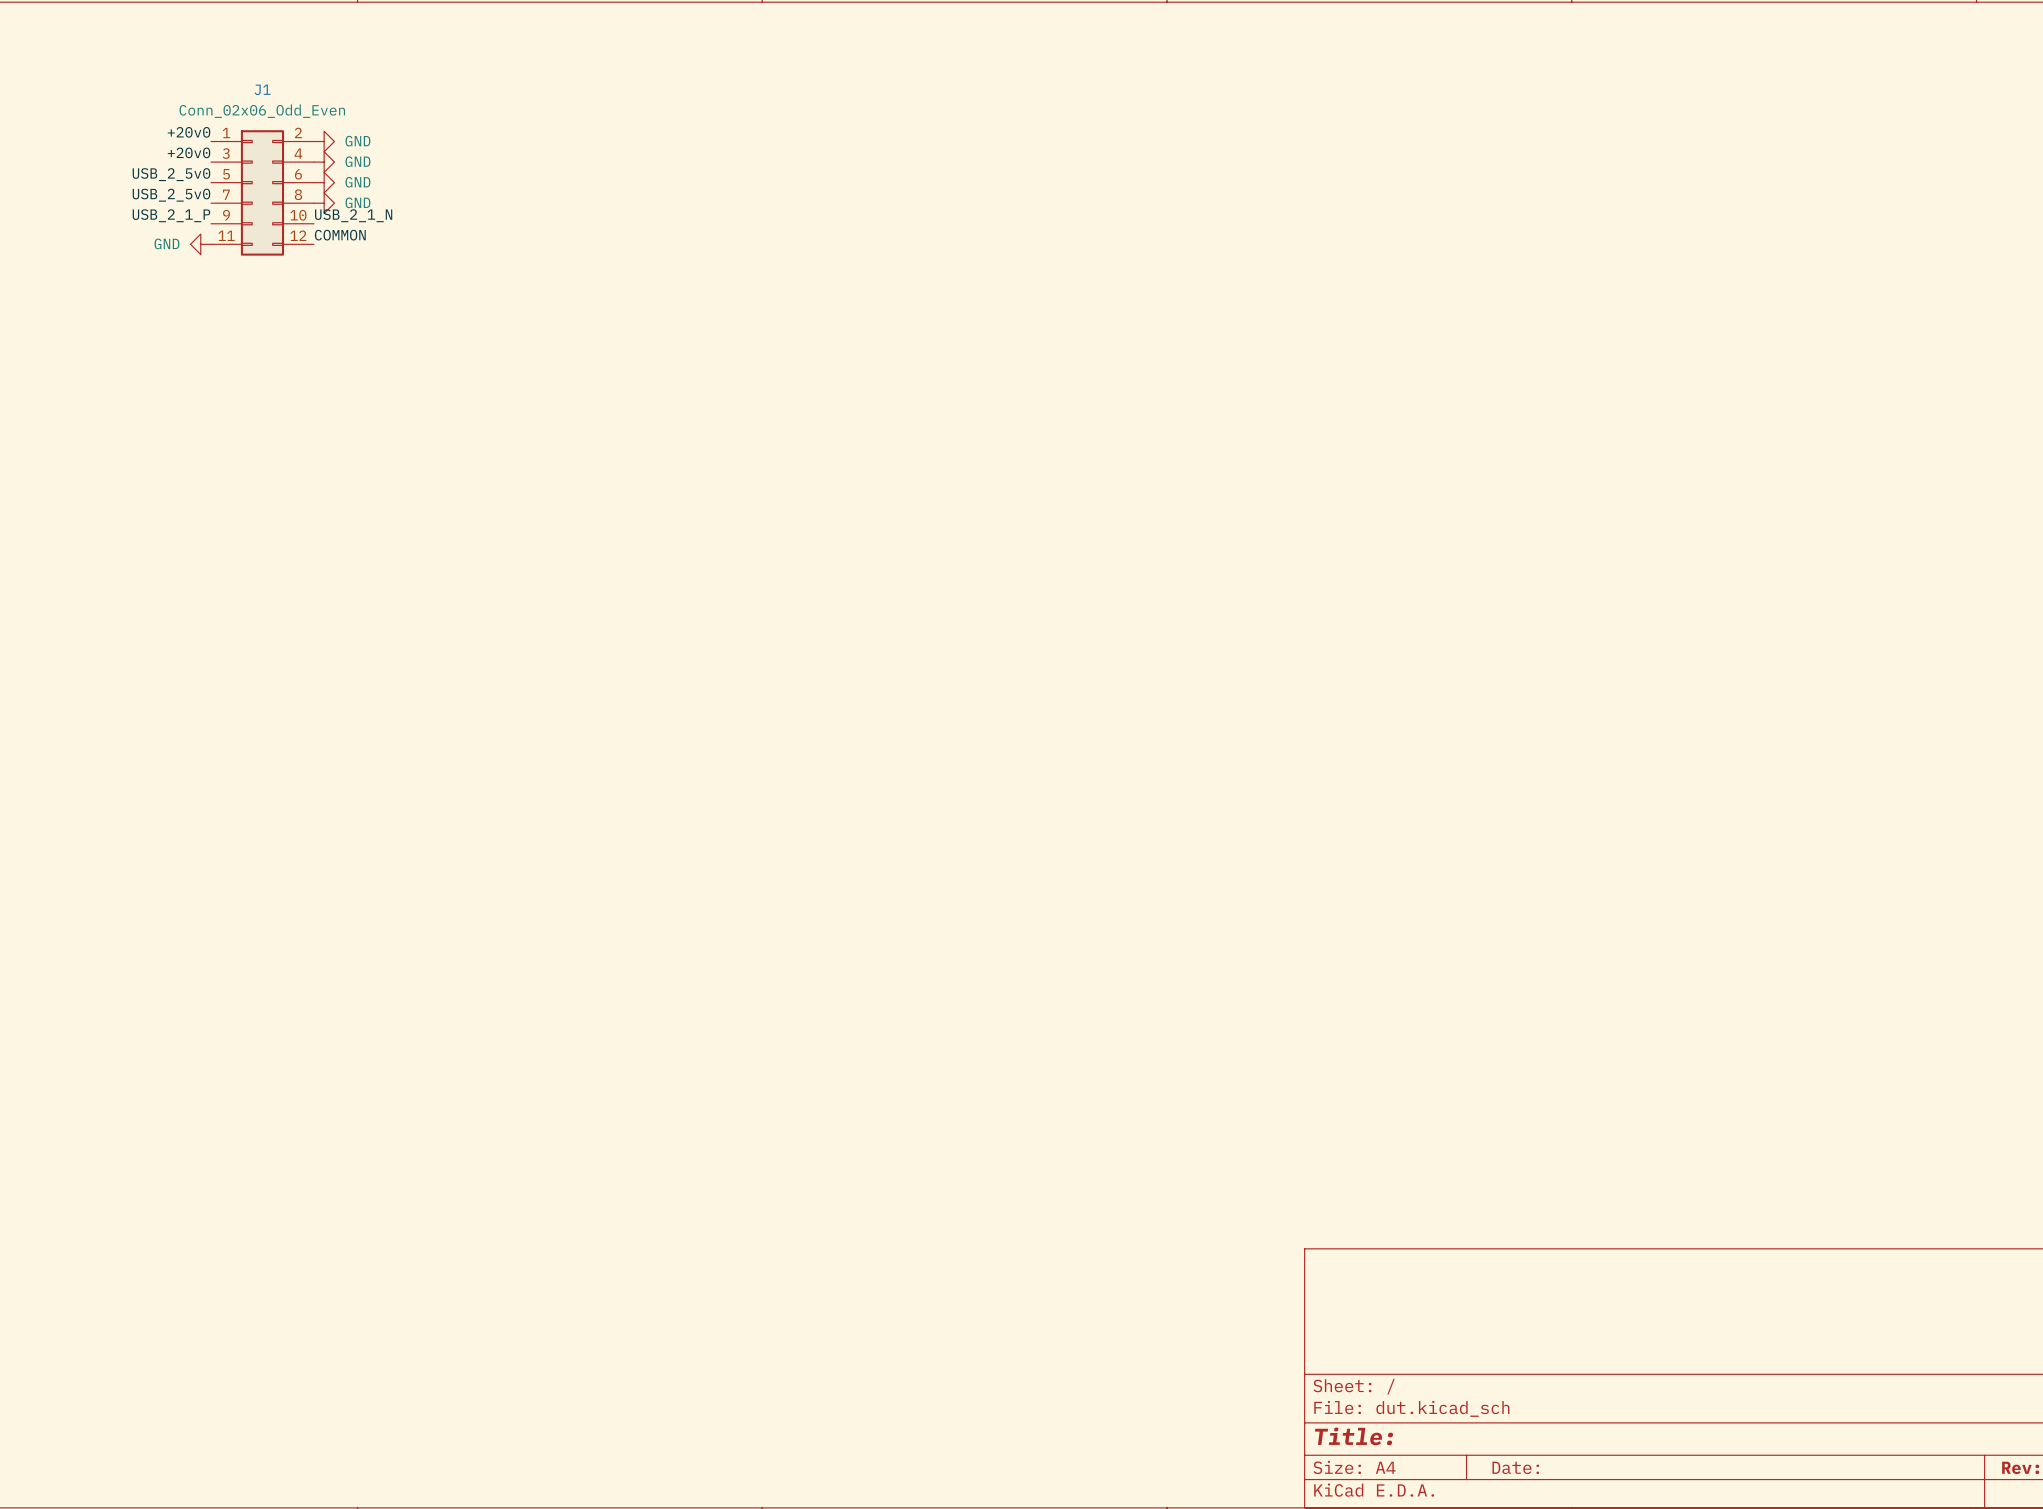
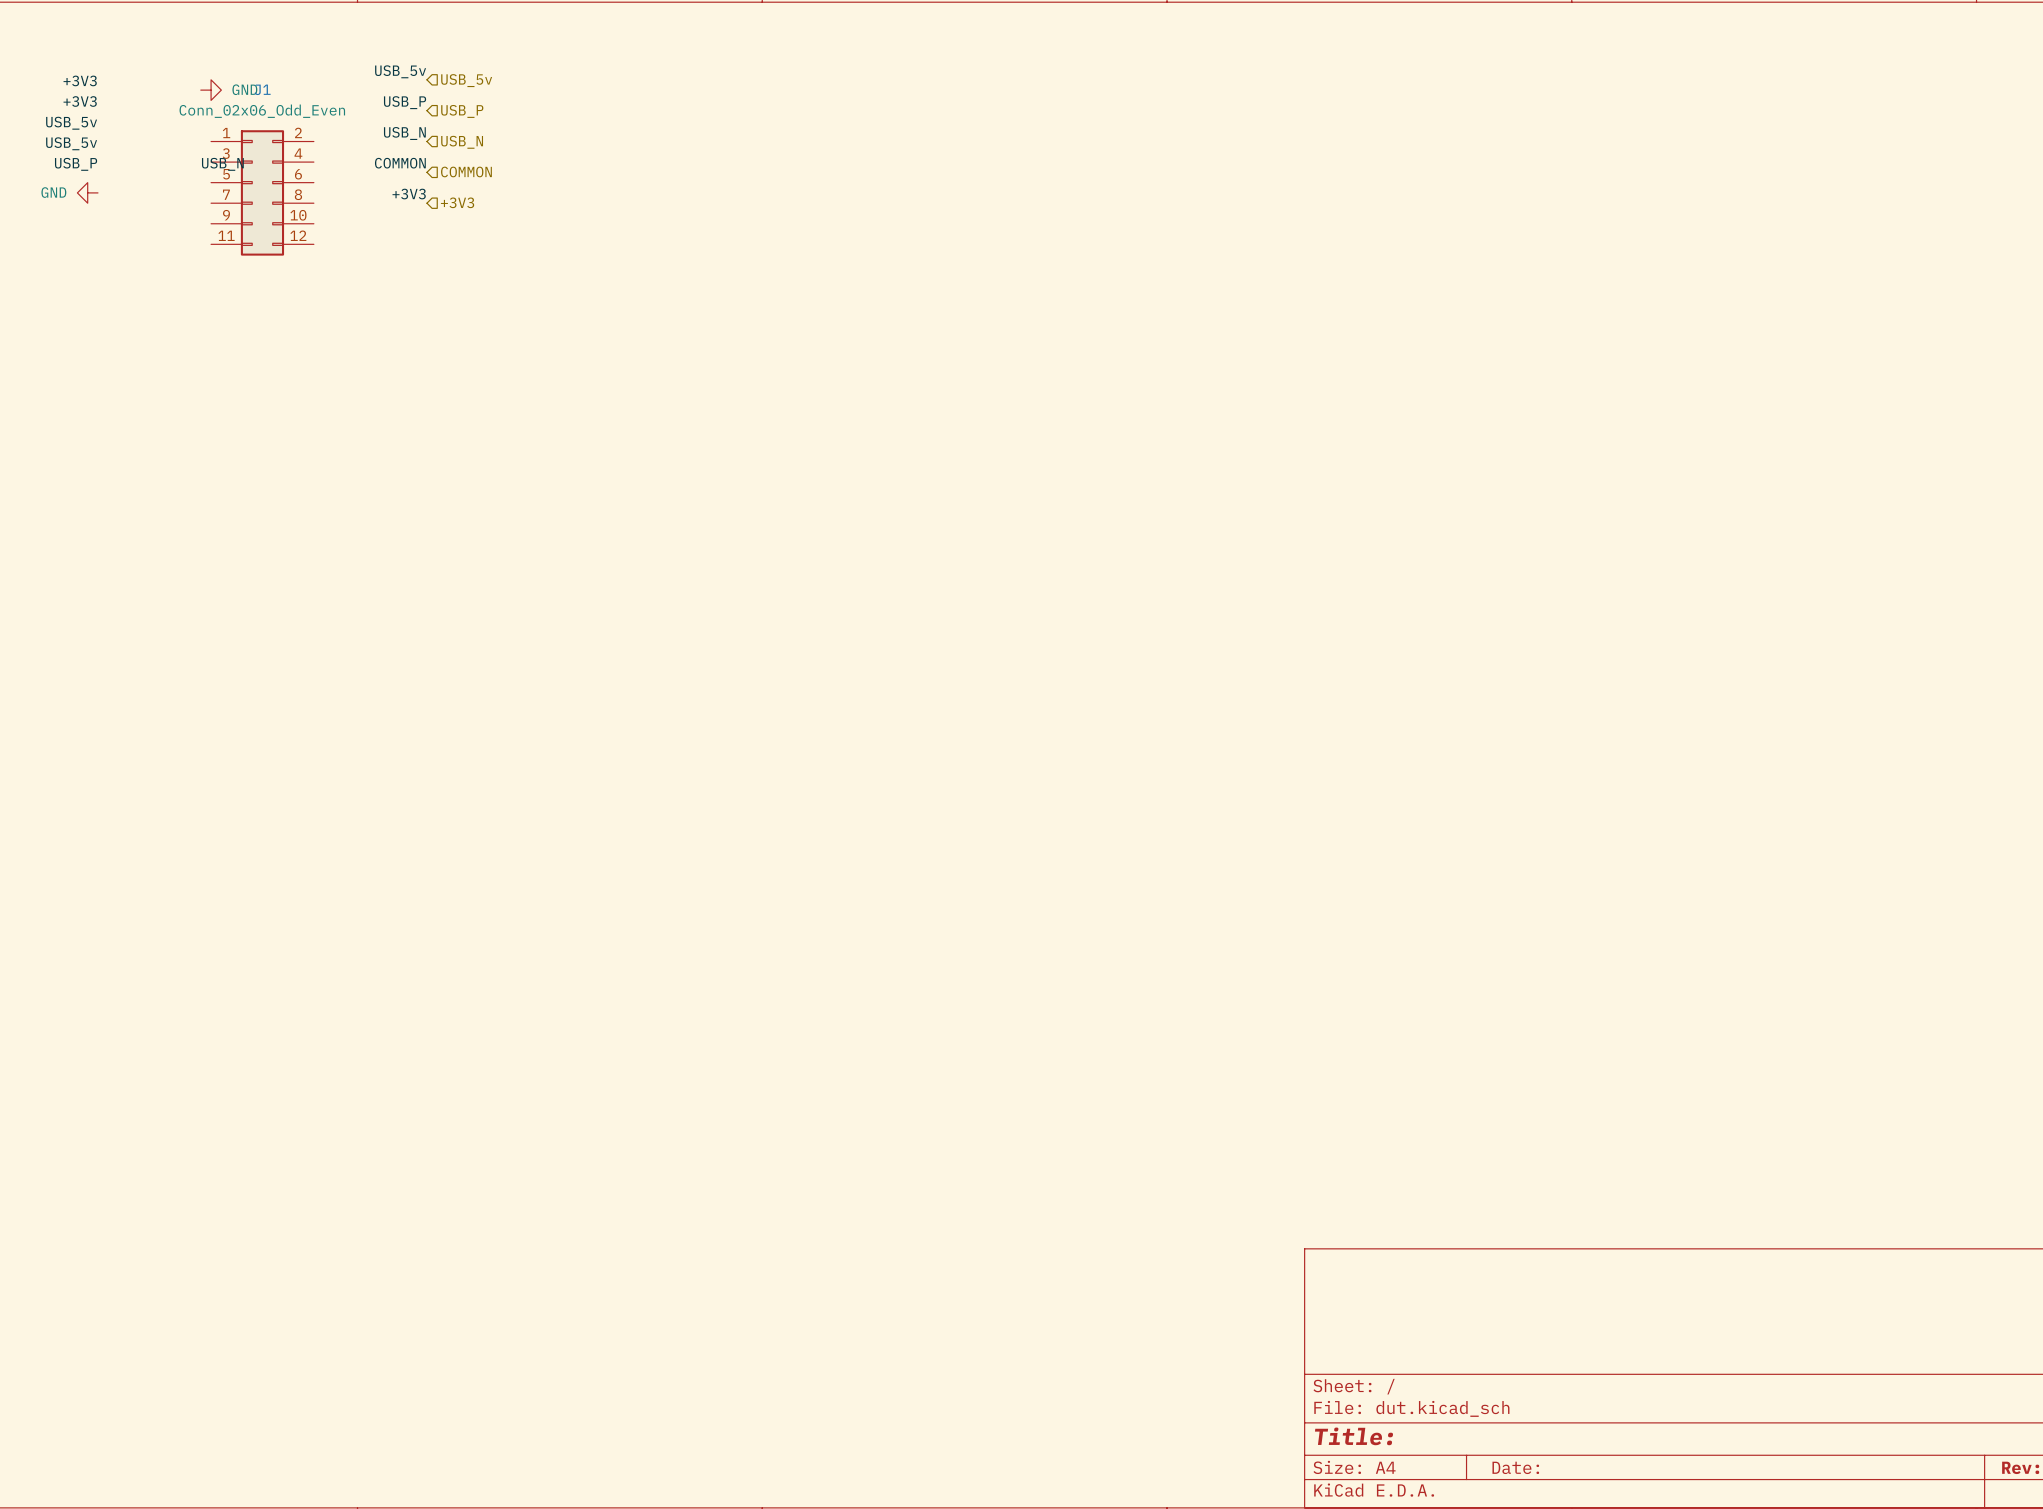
label: none -> USB_5v (400, 71)
label: none -> +3V3 (80, 80)
hierarchical label: none -> USB_5v (466, 80)
power symbol: none -> GND (211, 90)
label: none -> +3V3 (80, 101)
label: none -> USB_P (405, 102)
hierarchical label: none -> USB_P (462, 111)
label: none -> USB_5v (71, 123)
label: +20v0 (189, 132) -> none
label: none -> USB_N (404, 133)
power symbol: GND (324, 141) -> none
hierarchical label: none -> USB_N (462, 142)
label: none -> USB_5v (71, 143)
label: +20v0 (189, 152) -> none
power symbol: GND (324, 162) -> none
label: none -> USB_P (76, 164)
label: none -> USB_N (222, 164)
hierarchical label: none -> COMMON (466, 171)
label: USB_2_5v0 (171, 174) -> none
power symbol: GND (324, 182) -> none
power symbol: none -> GND (87, 192)
label: none -> +3V3 (409, 194)
label: USB_2_5v0 (171, 195) -> none
hierarchical label: none -> +3V3 (457, 202)
power symbol: GND (324, 203) -> none
label: USB_2_1_P (171, 215) -> none
label: USB_2_1_N (353, 215) -> none
label position: COMMON (340, 235) -> COMMON (400, 163)
power symbol: GND (200, 244) -> none

